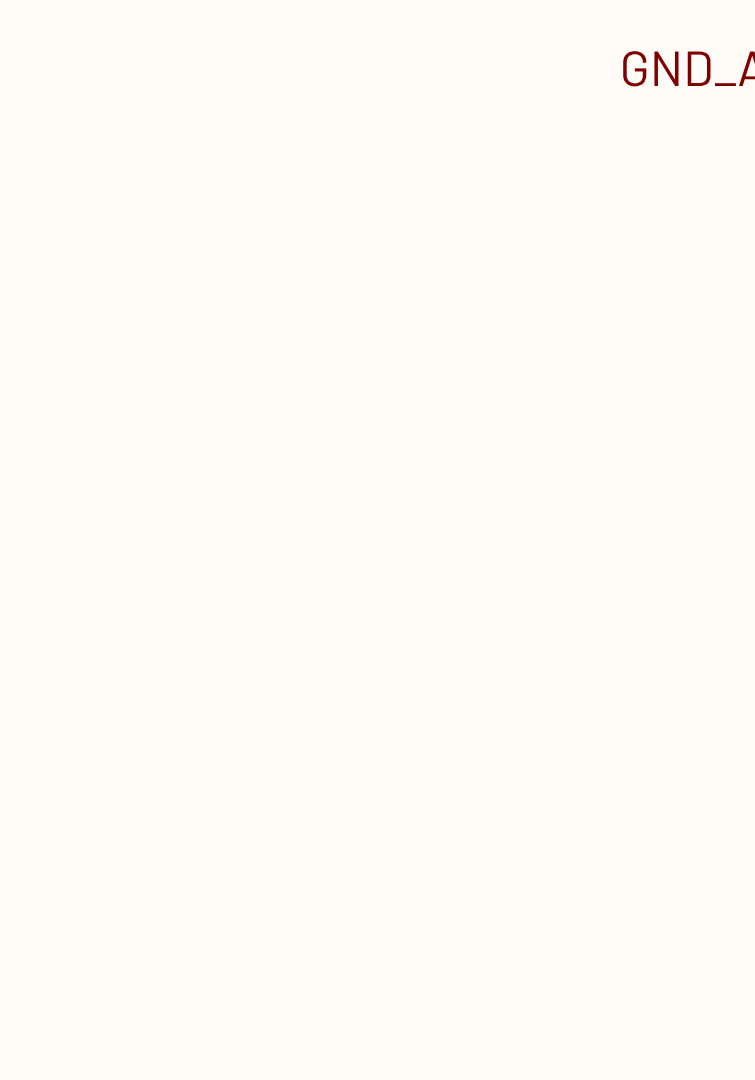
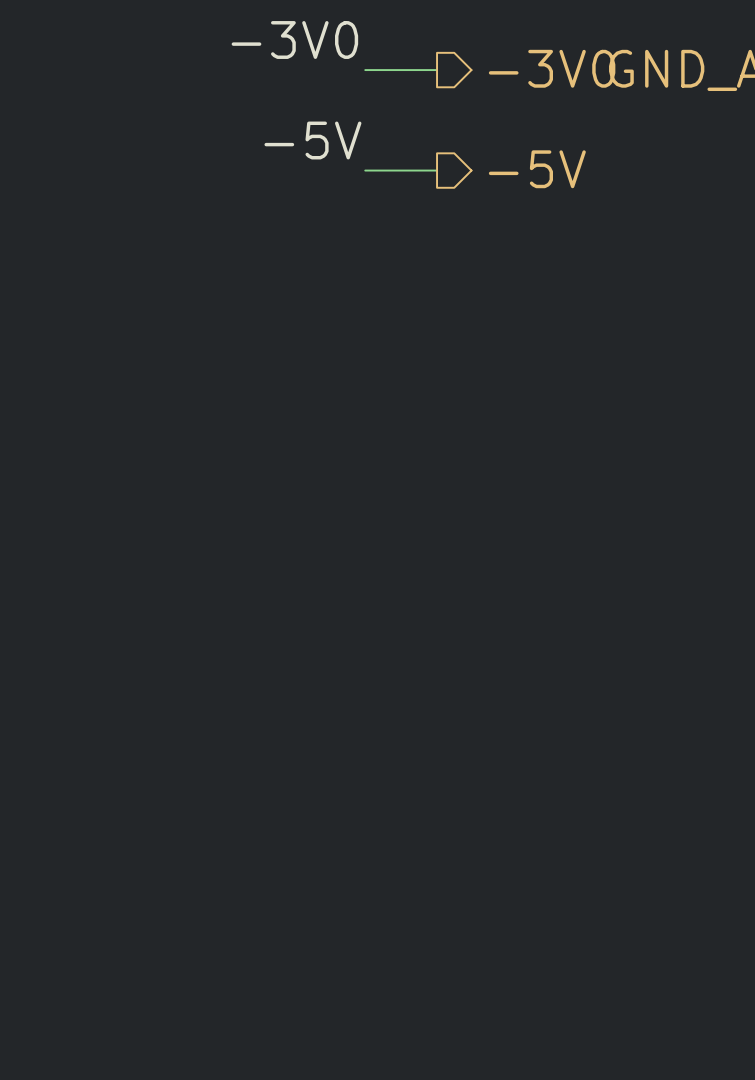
label: none -> -3V0 (294, 40)
hierarchical label: none -> -3V0 (552, 68)
wire: none -> (365, 70) (437, 70)
label: none -> -5V (312, 140)
hierarchical label: none -> -5V (537, 169)
wire: none -> (365, 170) (437, 170)

